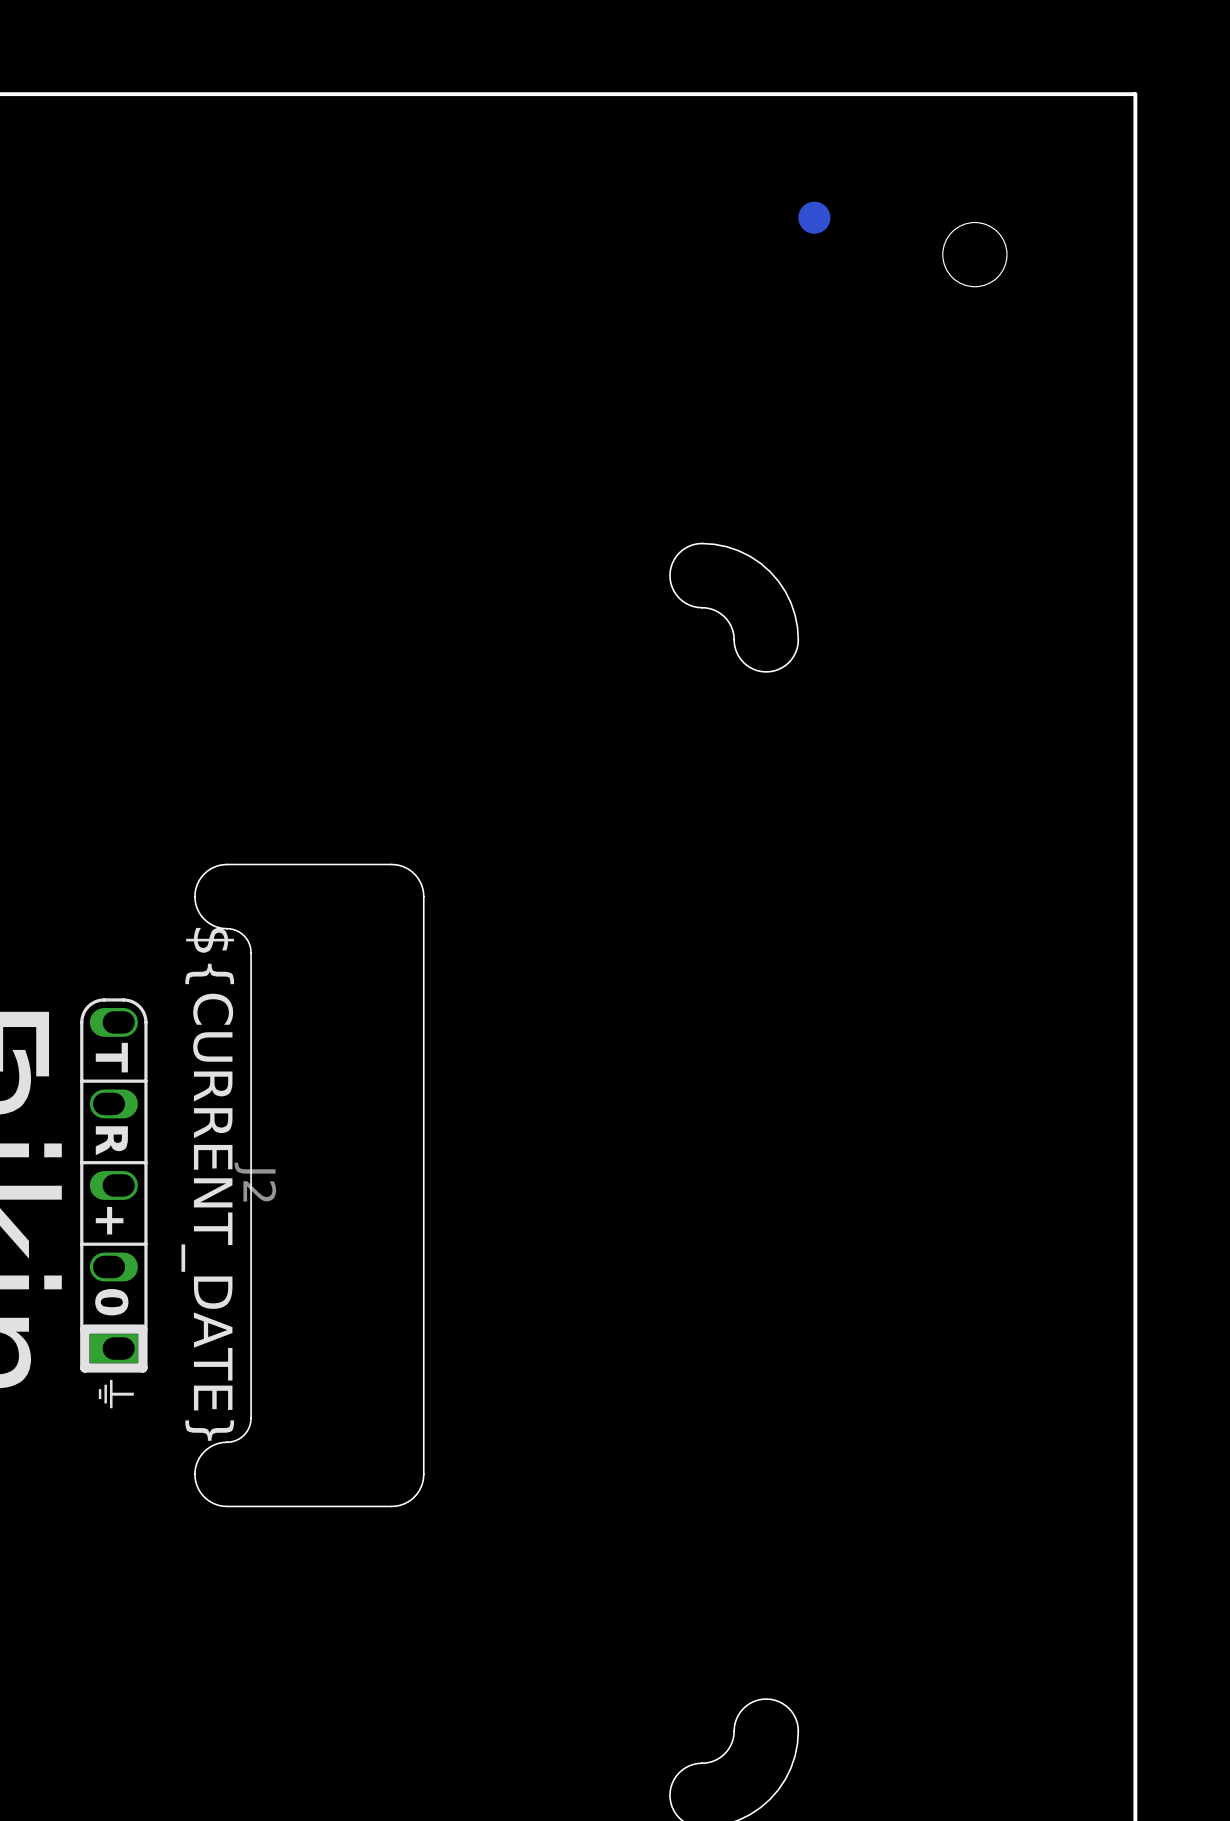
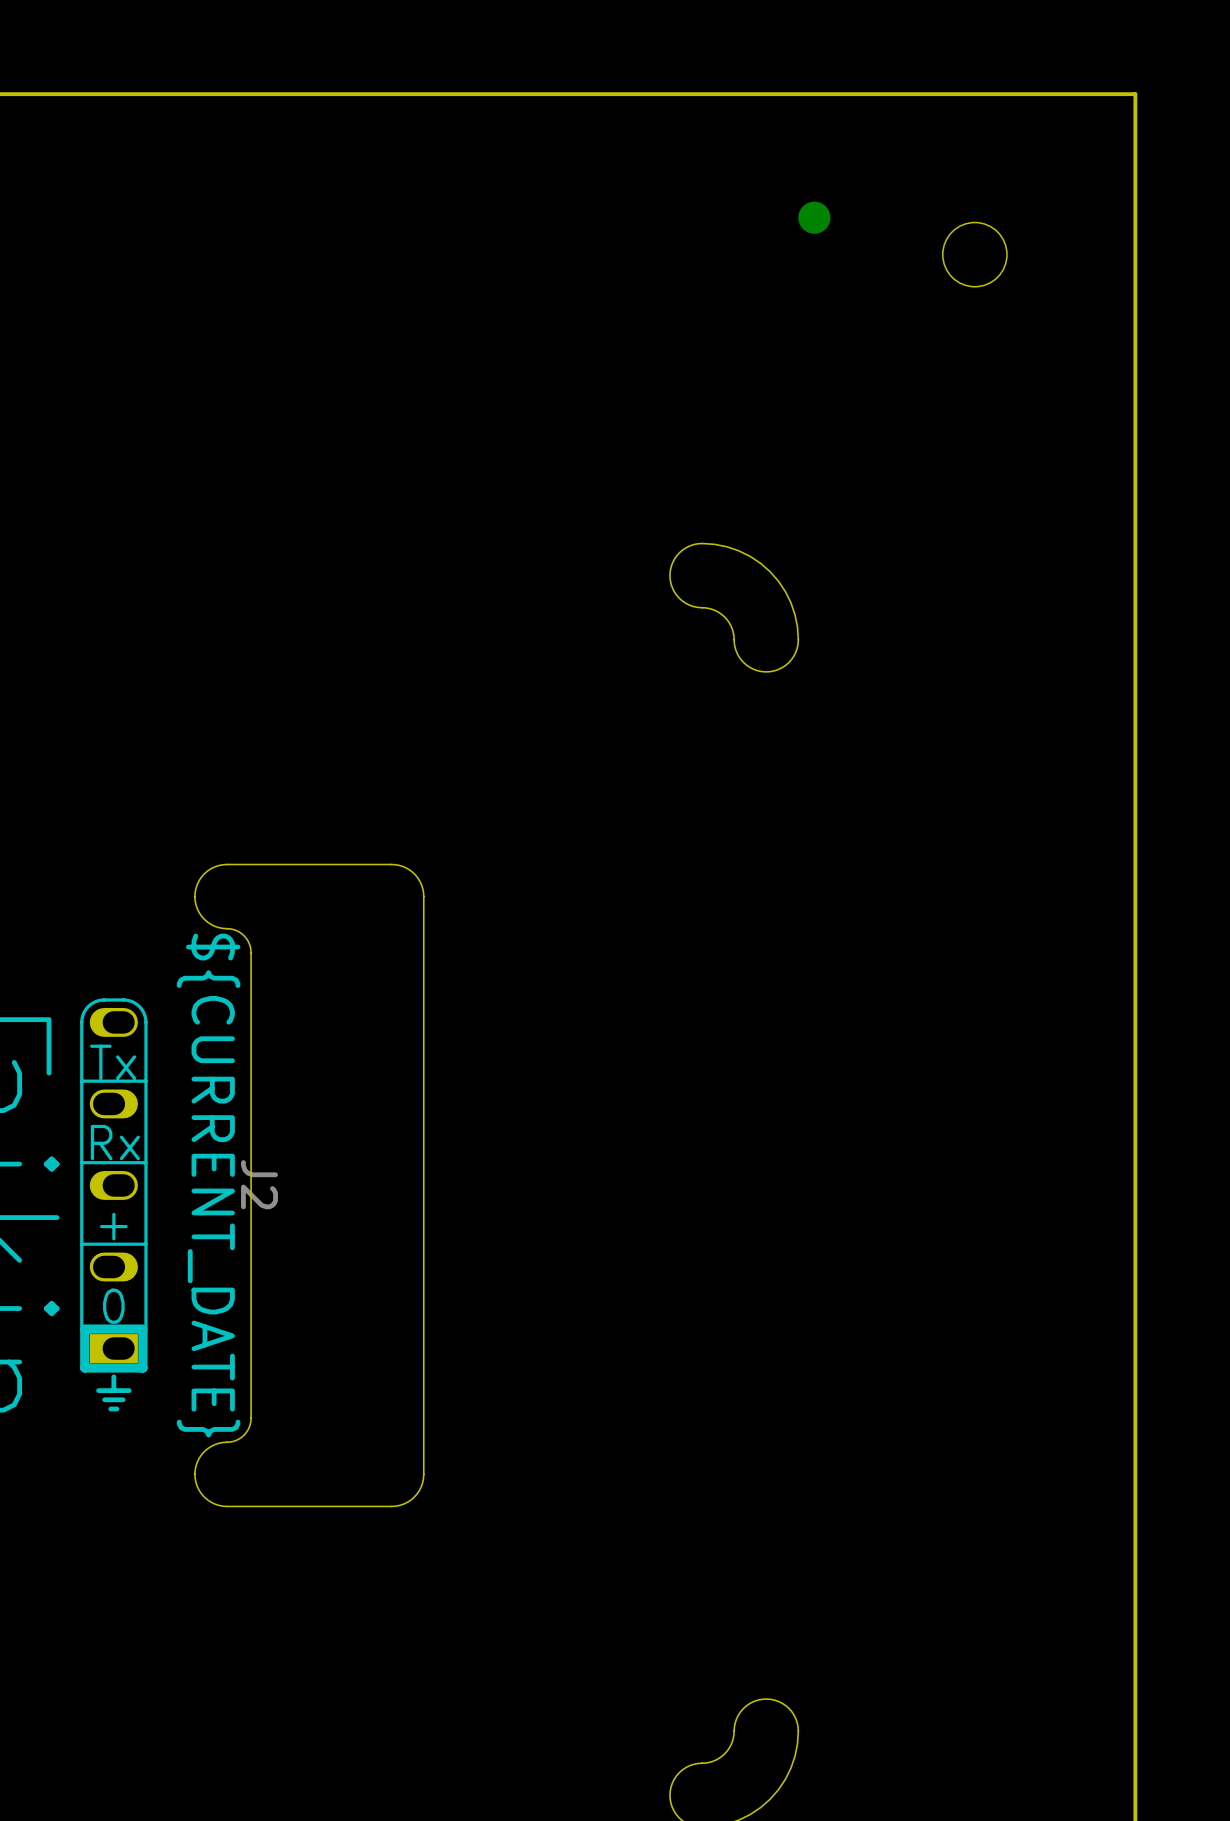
J2 footprint: [80, 998, 148, 1373] -> [80, 998, 148, 1373]

